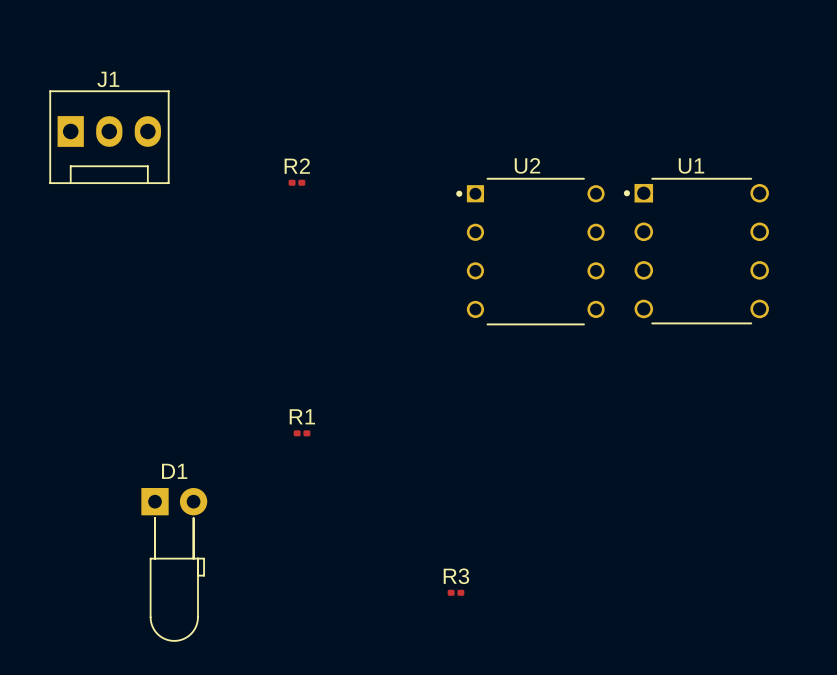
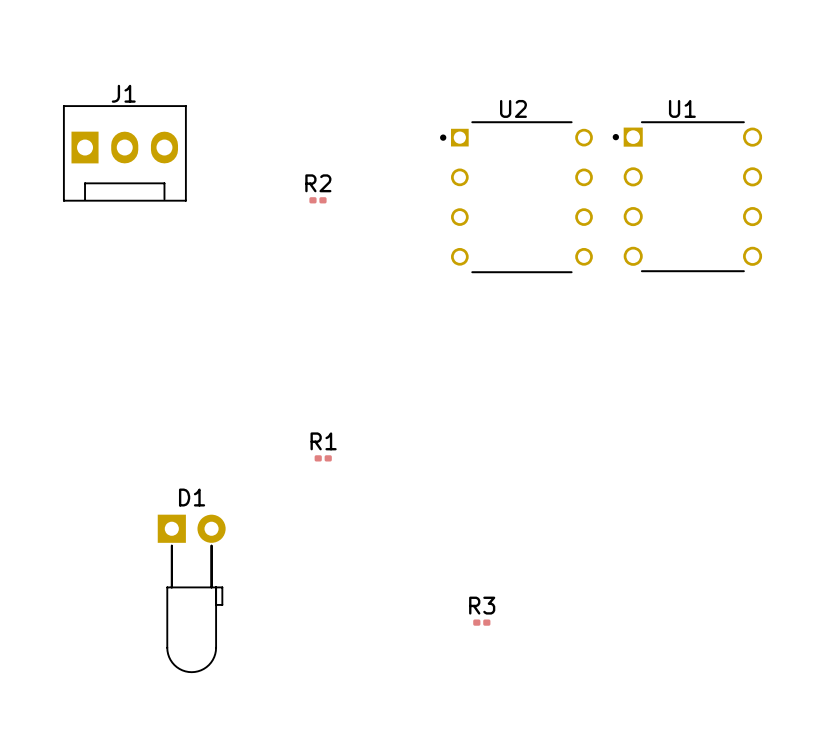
U2 position: (530, 251) -> (516, 197)
U1 position: (696, 251) -> (687, 196)

